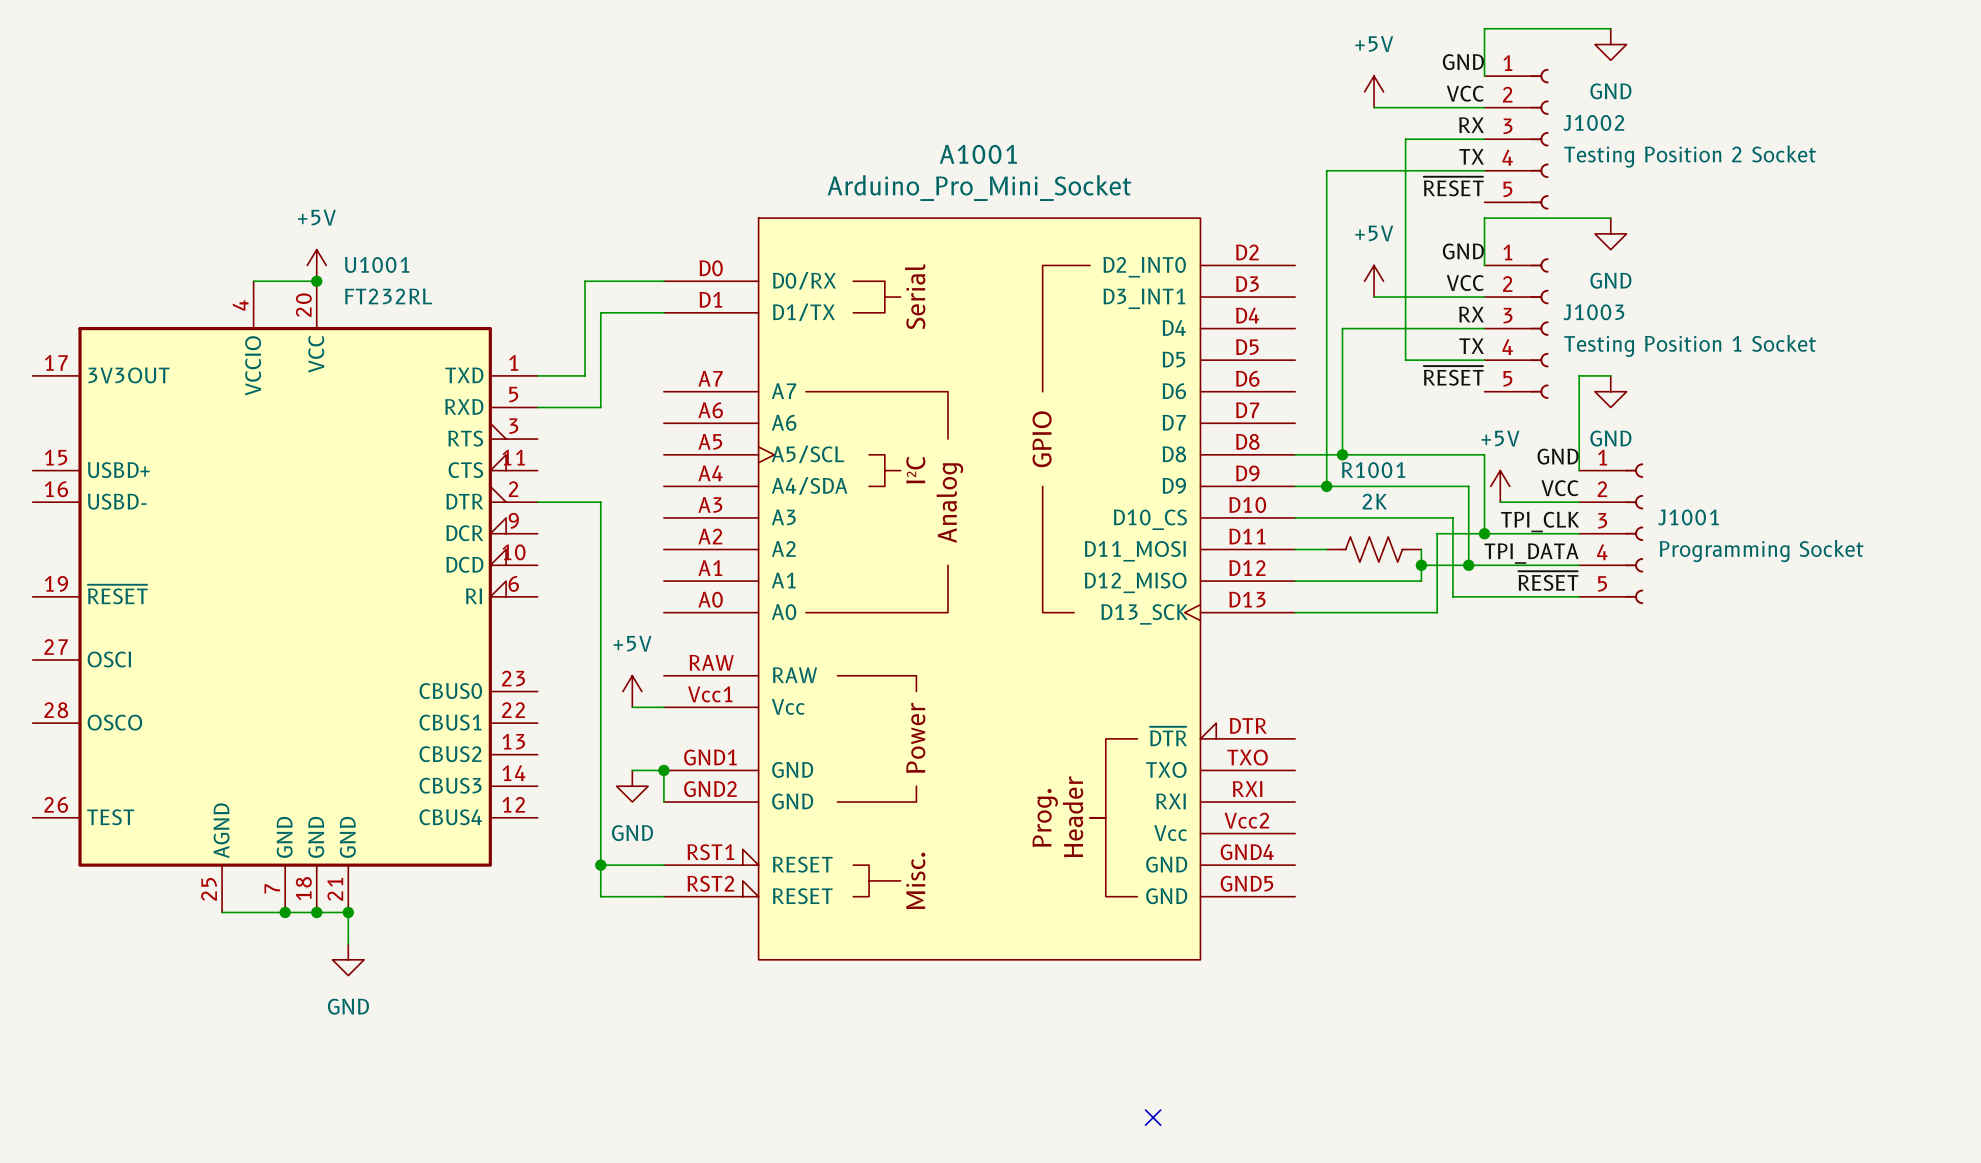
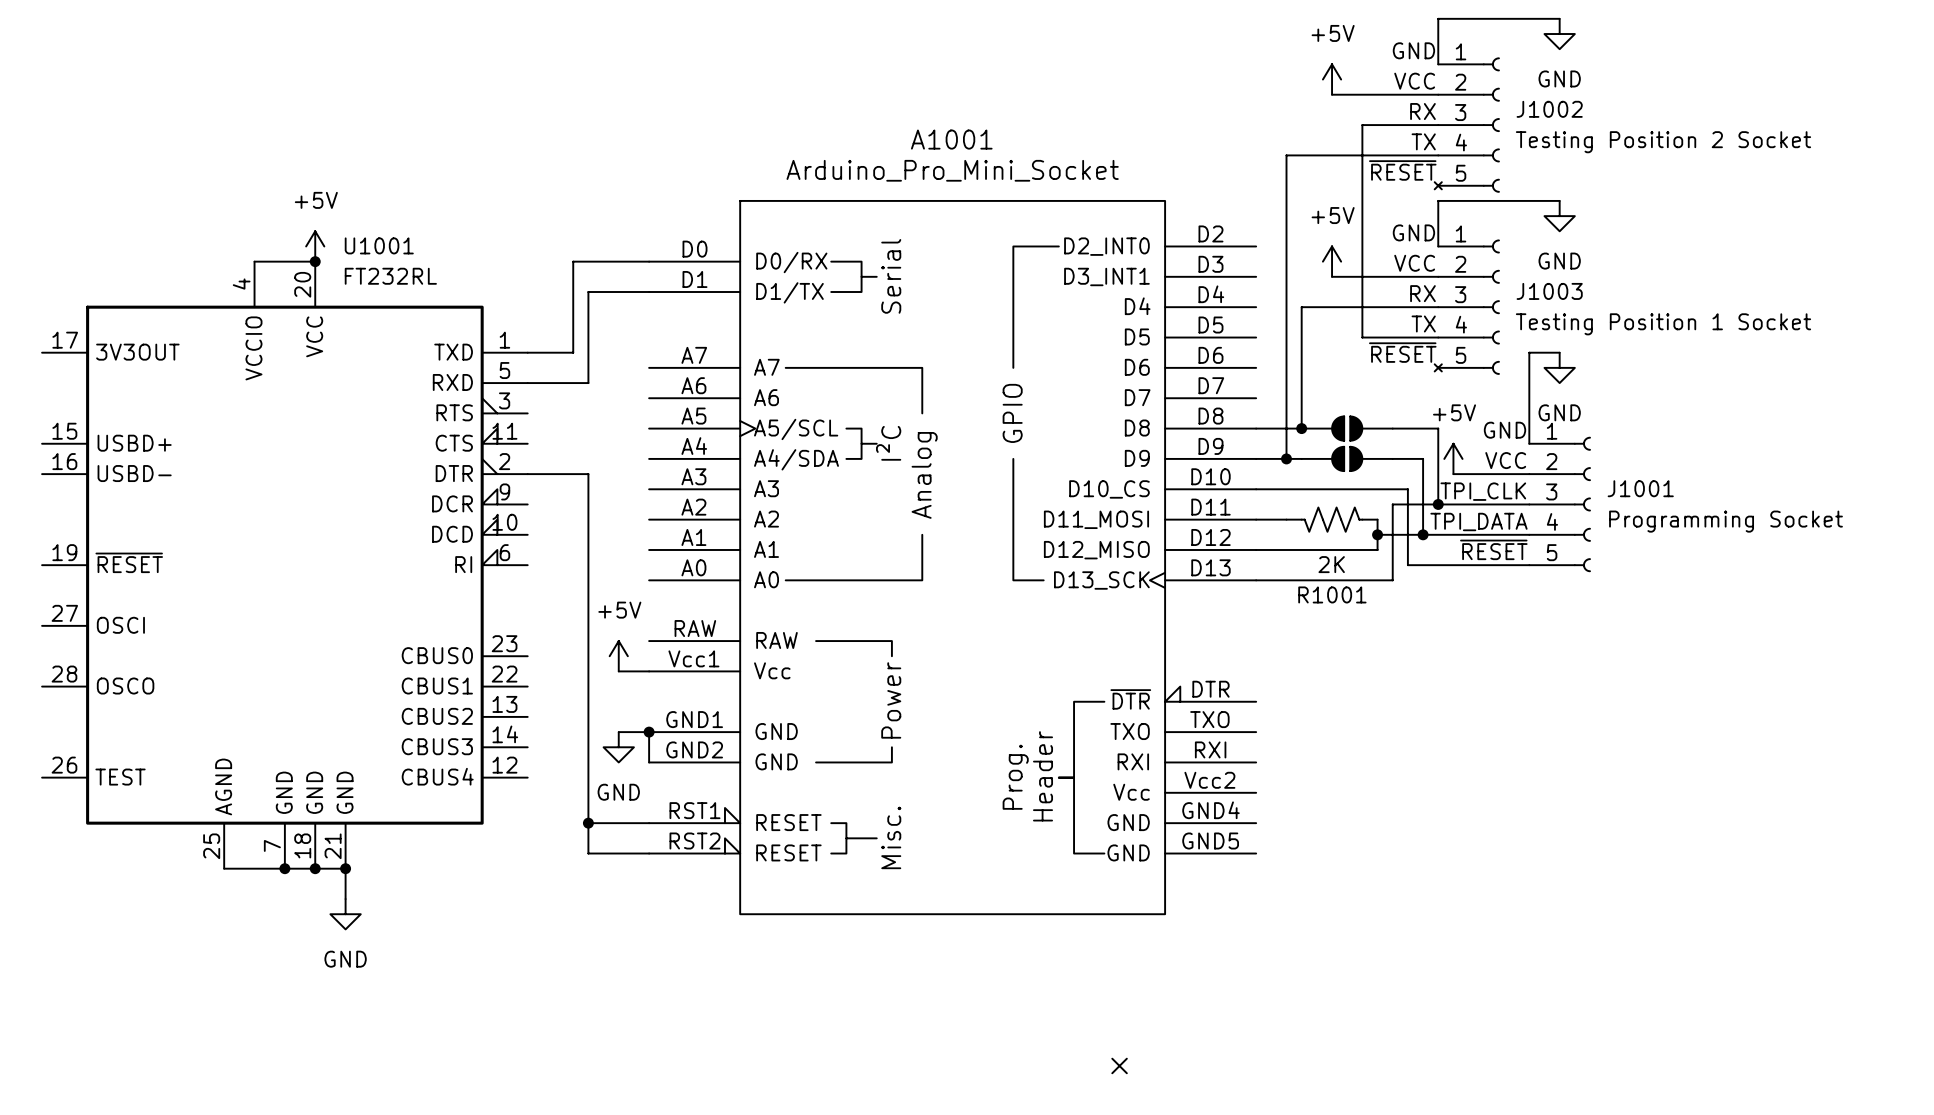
J1002 symbol: [1484, 68, 1549, 210] -> [1434, 57, 1500, 193]
J1003 symbol: [1484, 258, 1549, 399] -> [1434, 239, 1500, 375]
part: none -> (1347, 428)
R1001 name position: R1001 (1373, 470) -> R1001 (1332, 594)
part: none -> (1347, 458)
R1001 value position: 2K (1374, 501) -> 2K (1331, 564)
R1001 flip: as is (1374, 549) -> left-right (1332, 519)

